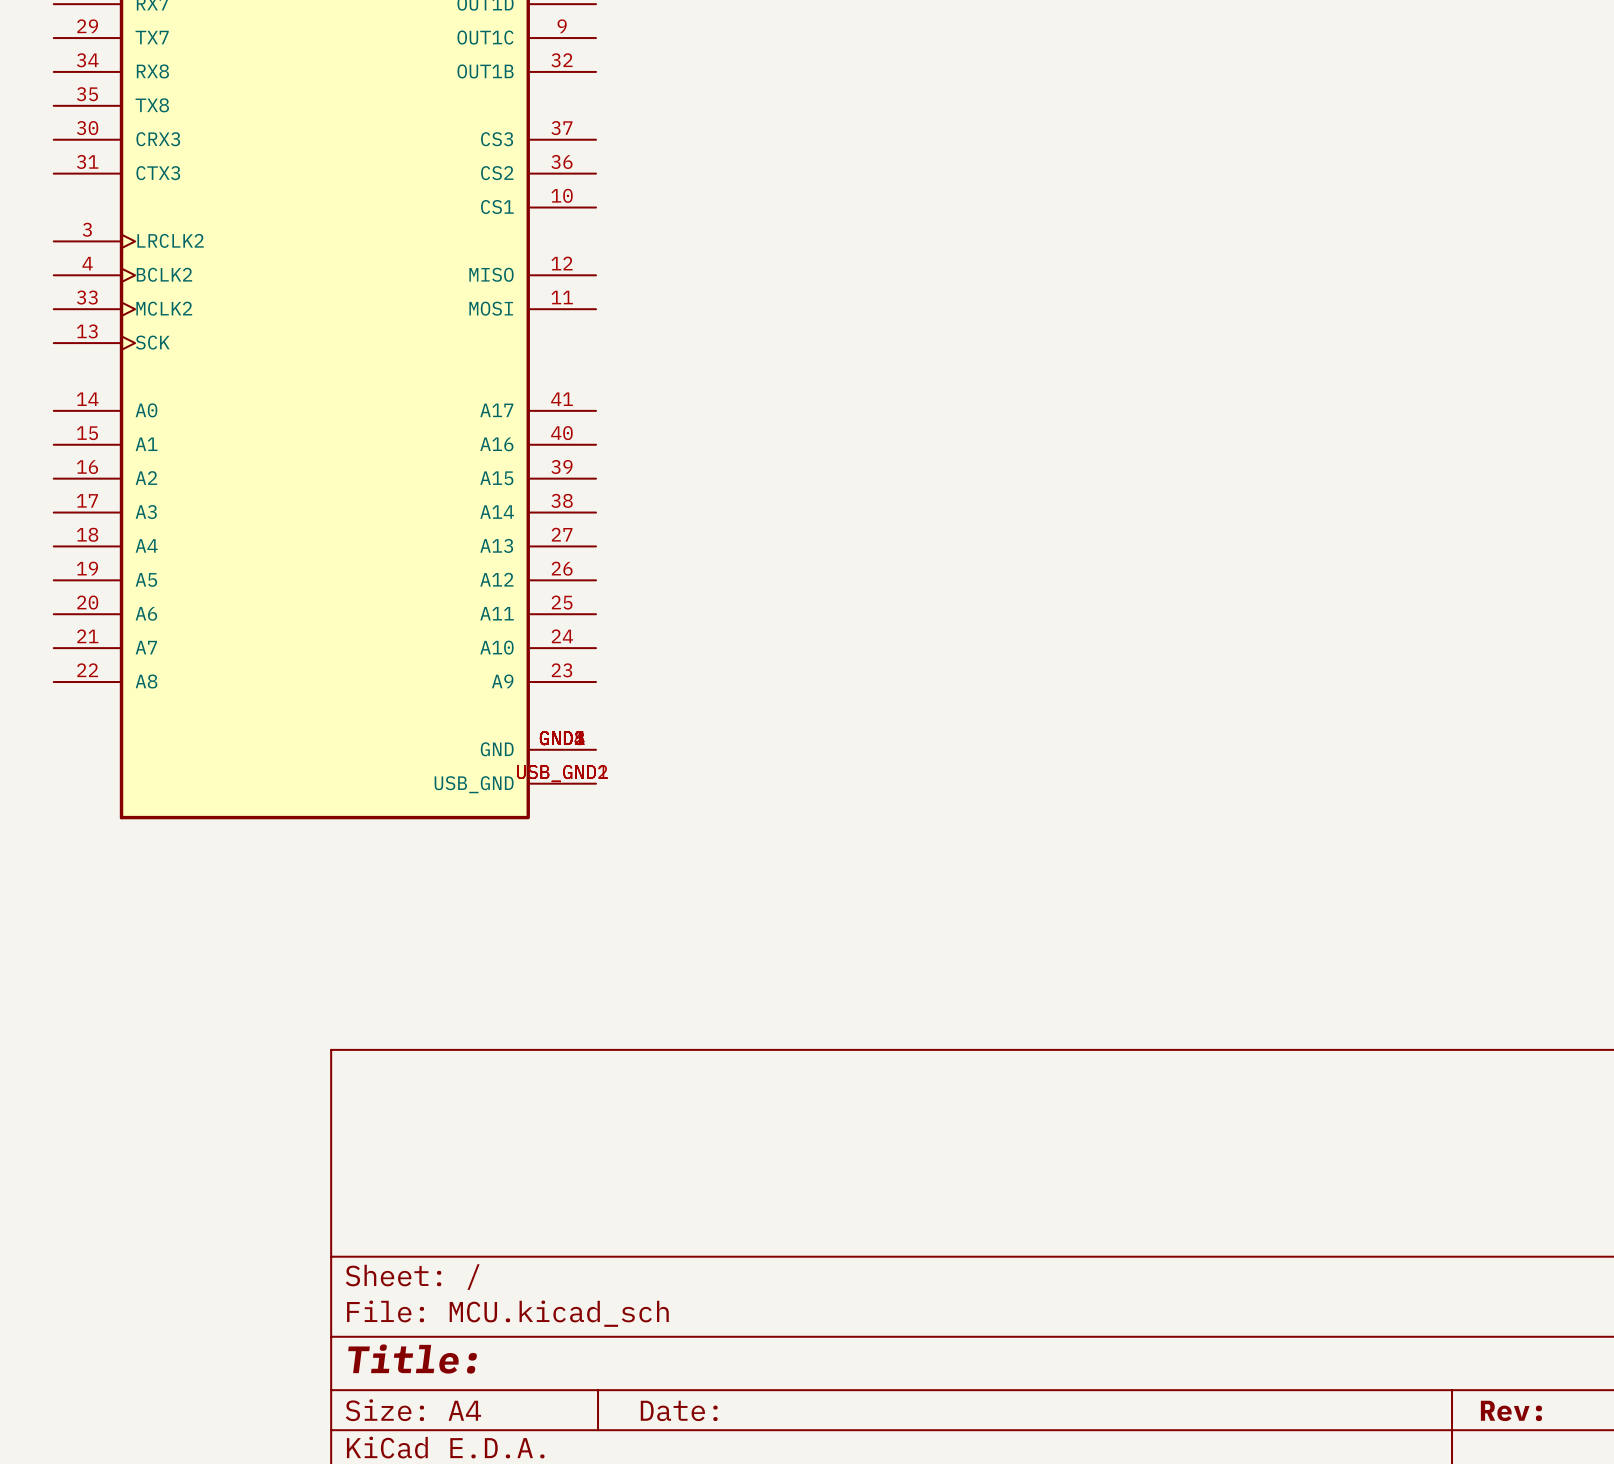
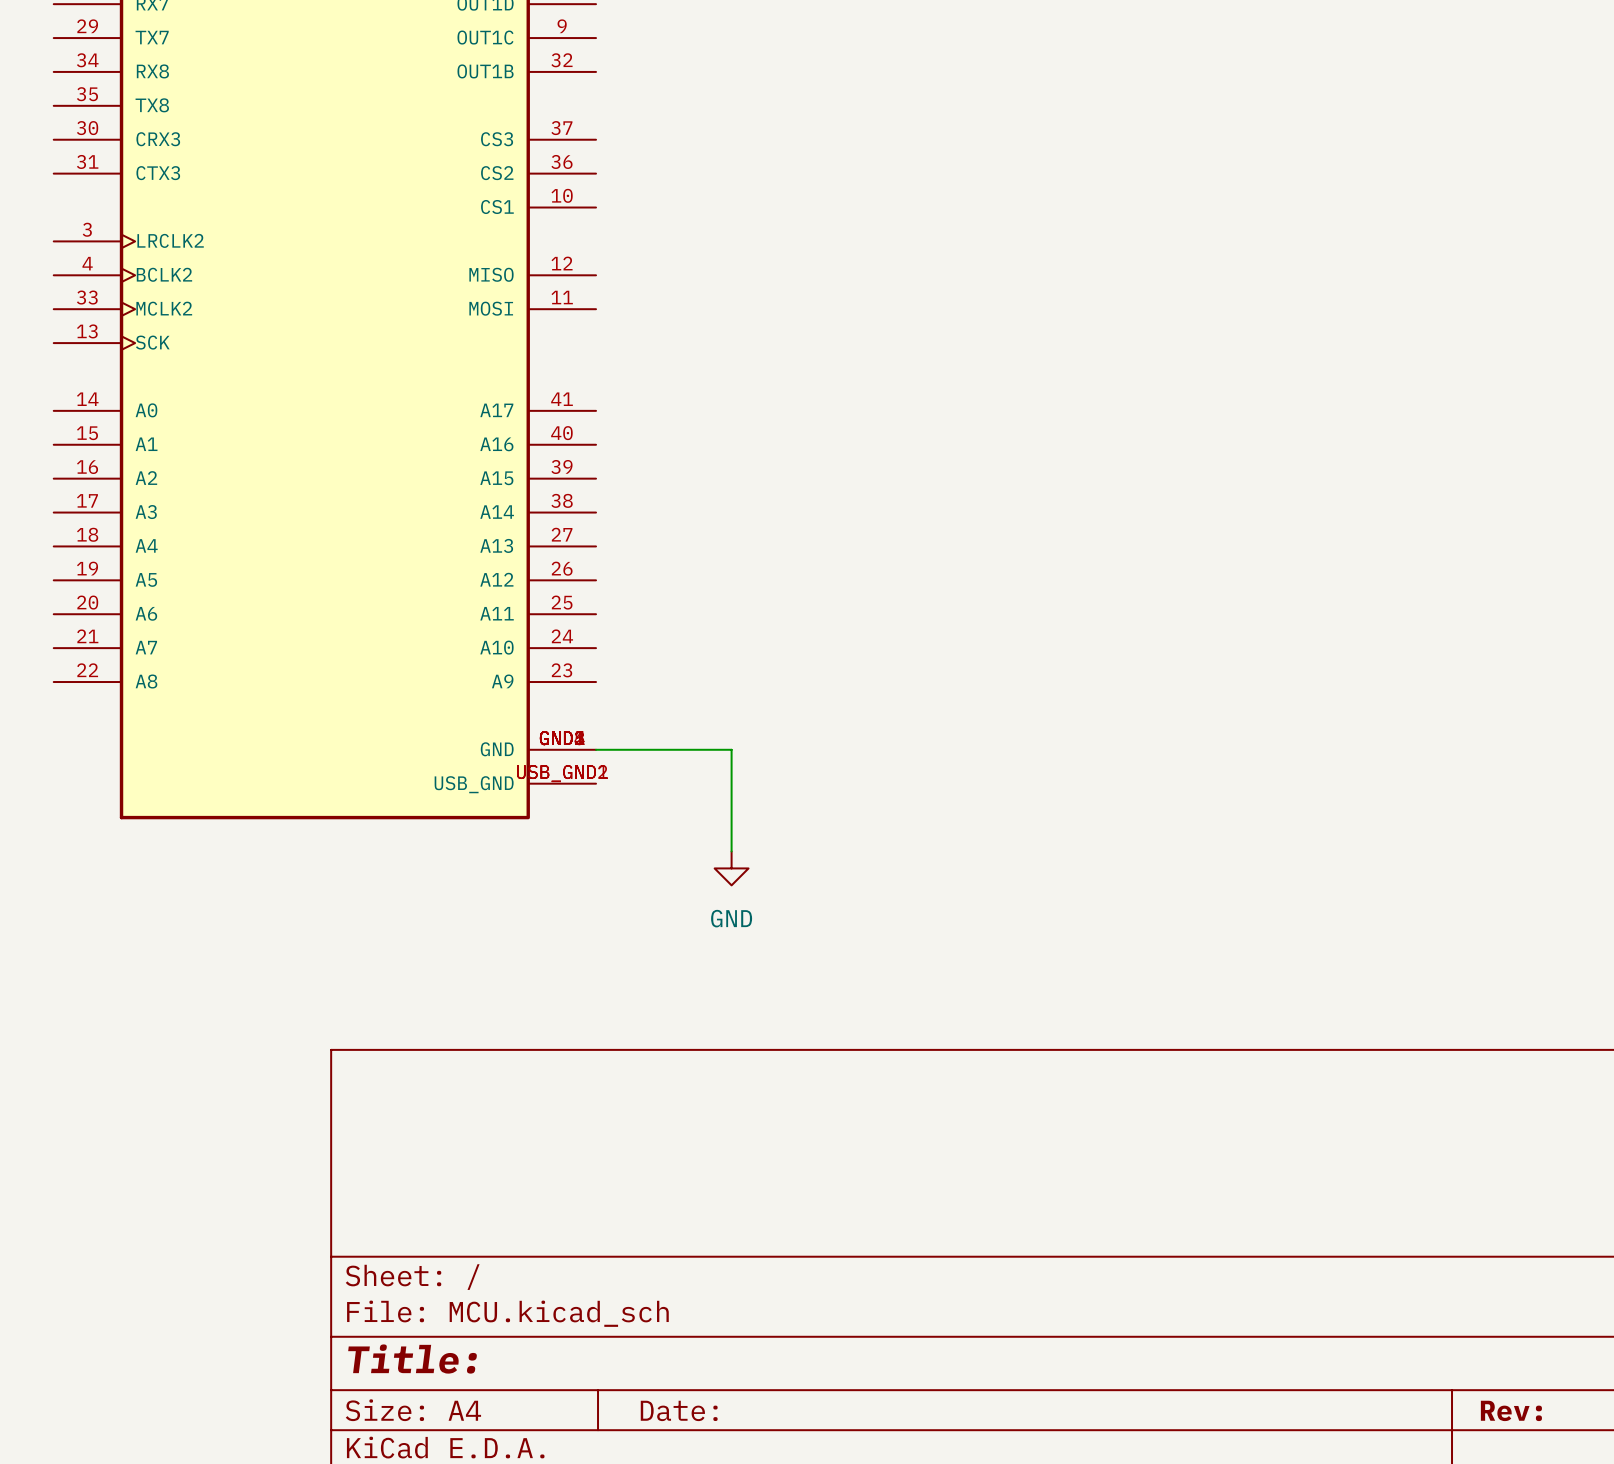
wire: none -> (596, 749) (731, 749) (731, 851)
power symbol: none -> GND (731, 868)

